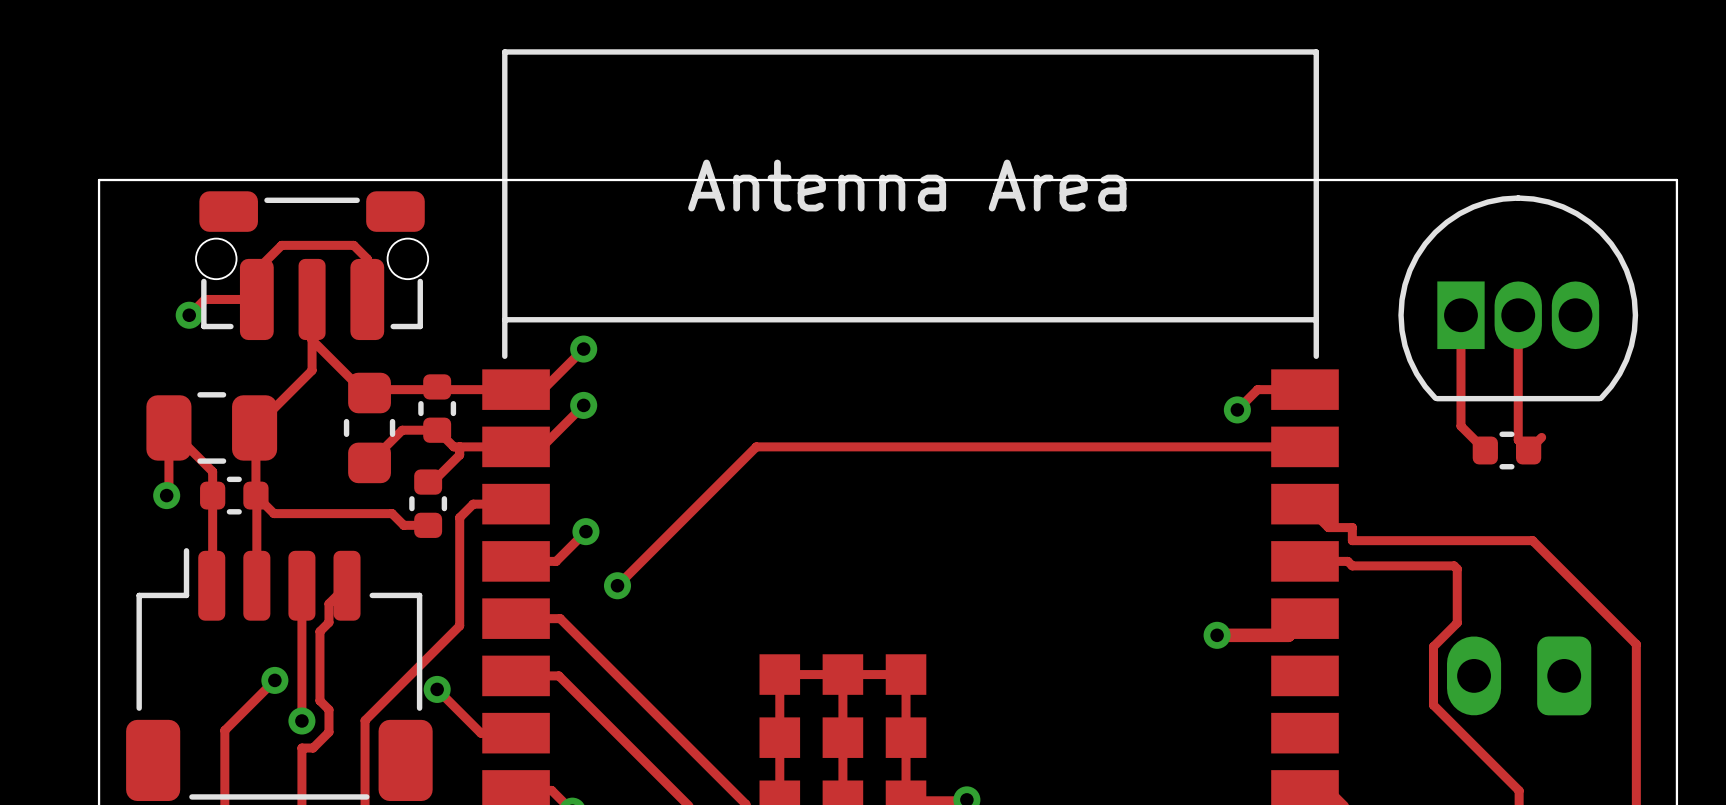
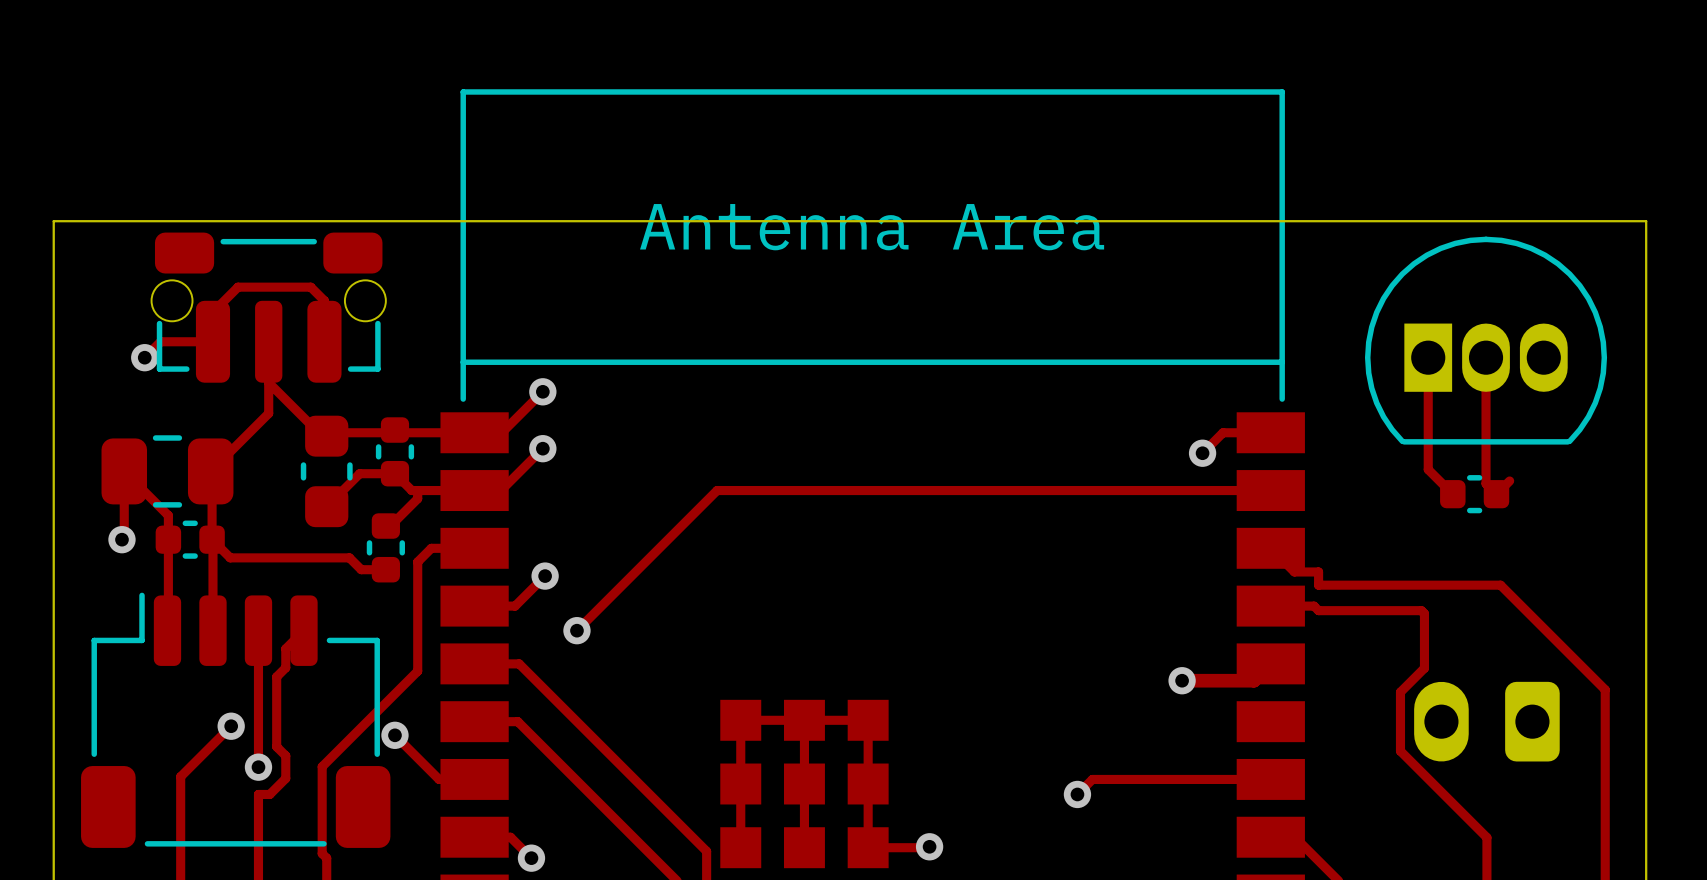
track: none -> (1270, 779) (1092, 779) (1077, 794)
via: none -> (1077, 794)

